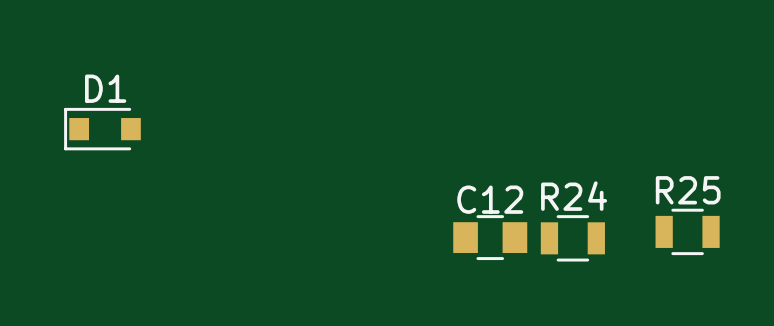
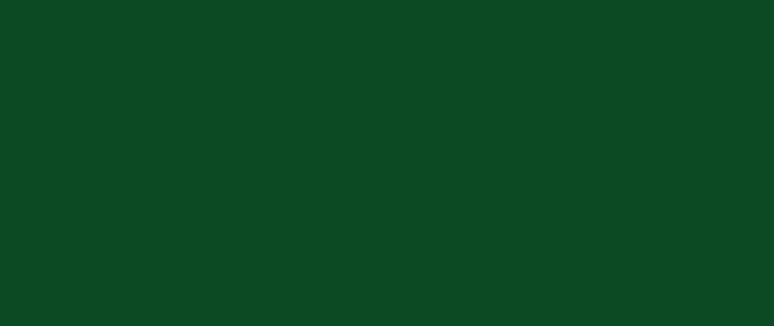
D1: (102, 129) -> none
R25: (687, 231) -> none
C12: (490, 237) -> none
R24: (572, 238) -> none

